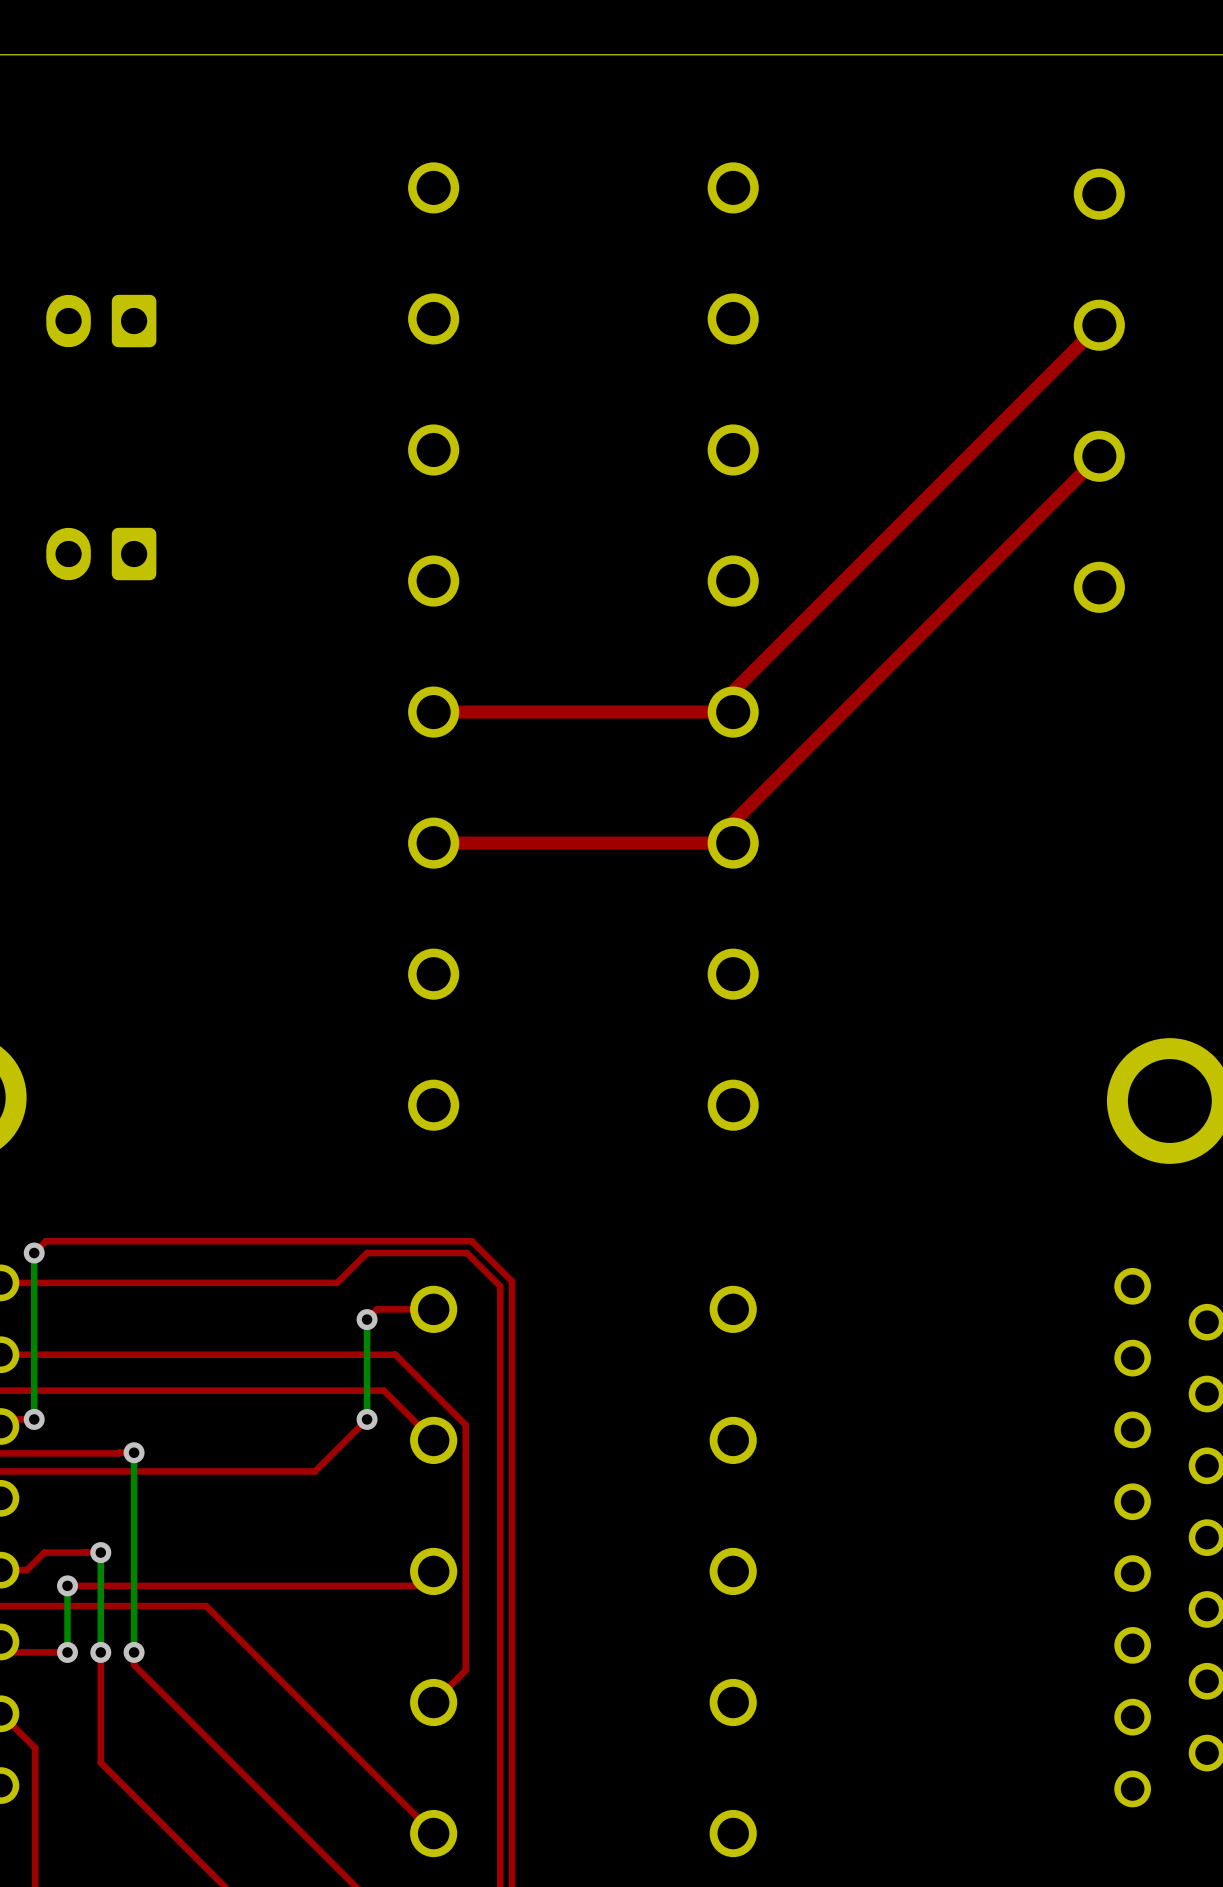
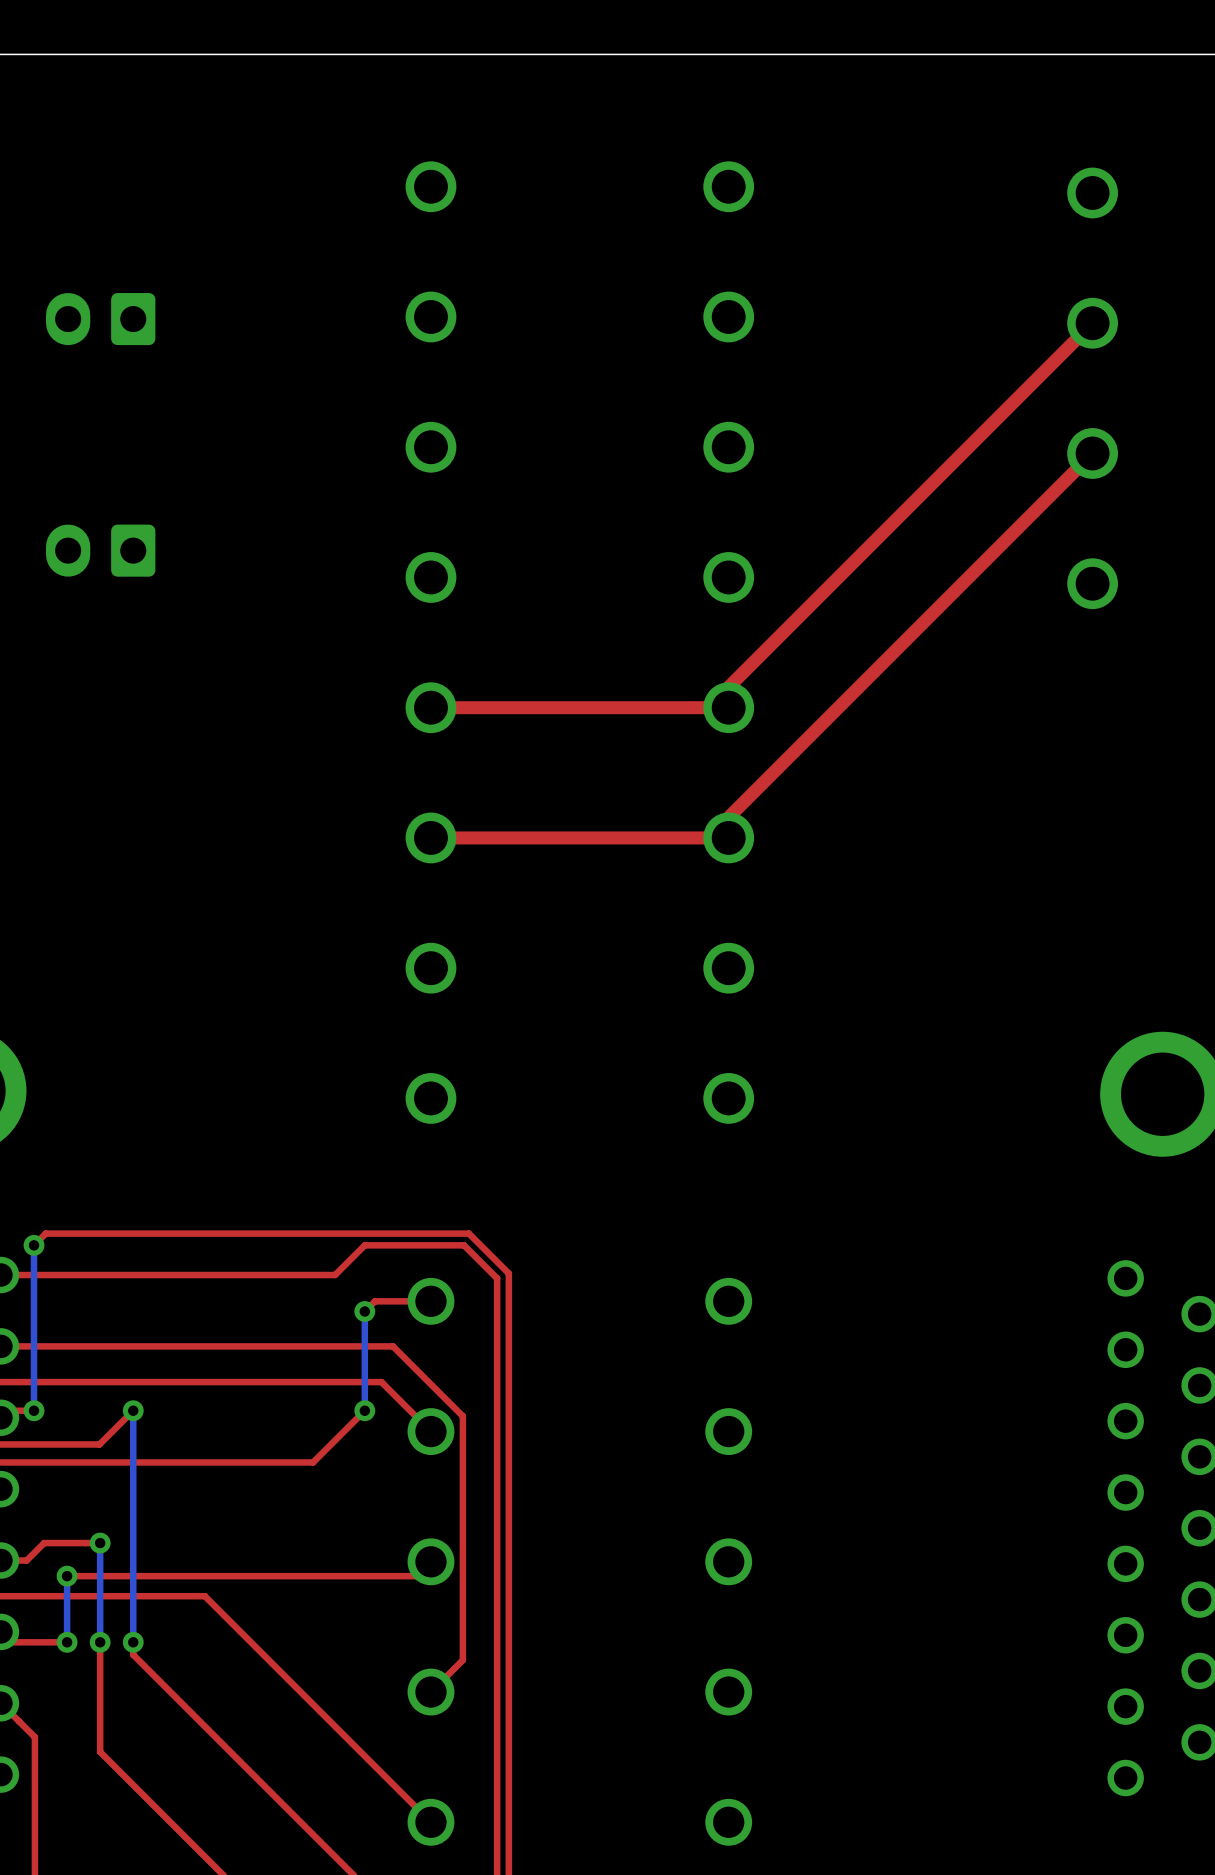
bottom track: none -> (133, 1410) (133, 1443)
top track: (134, 1452) (100, 1453) -> (133, 1410) (99, 1444)
via position: (134, 1452) -> (133, 1410)

